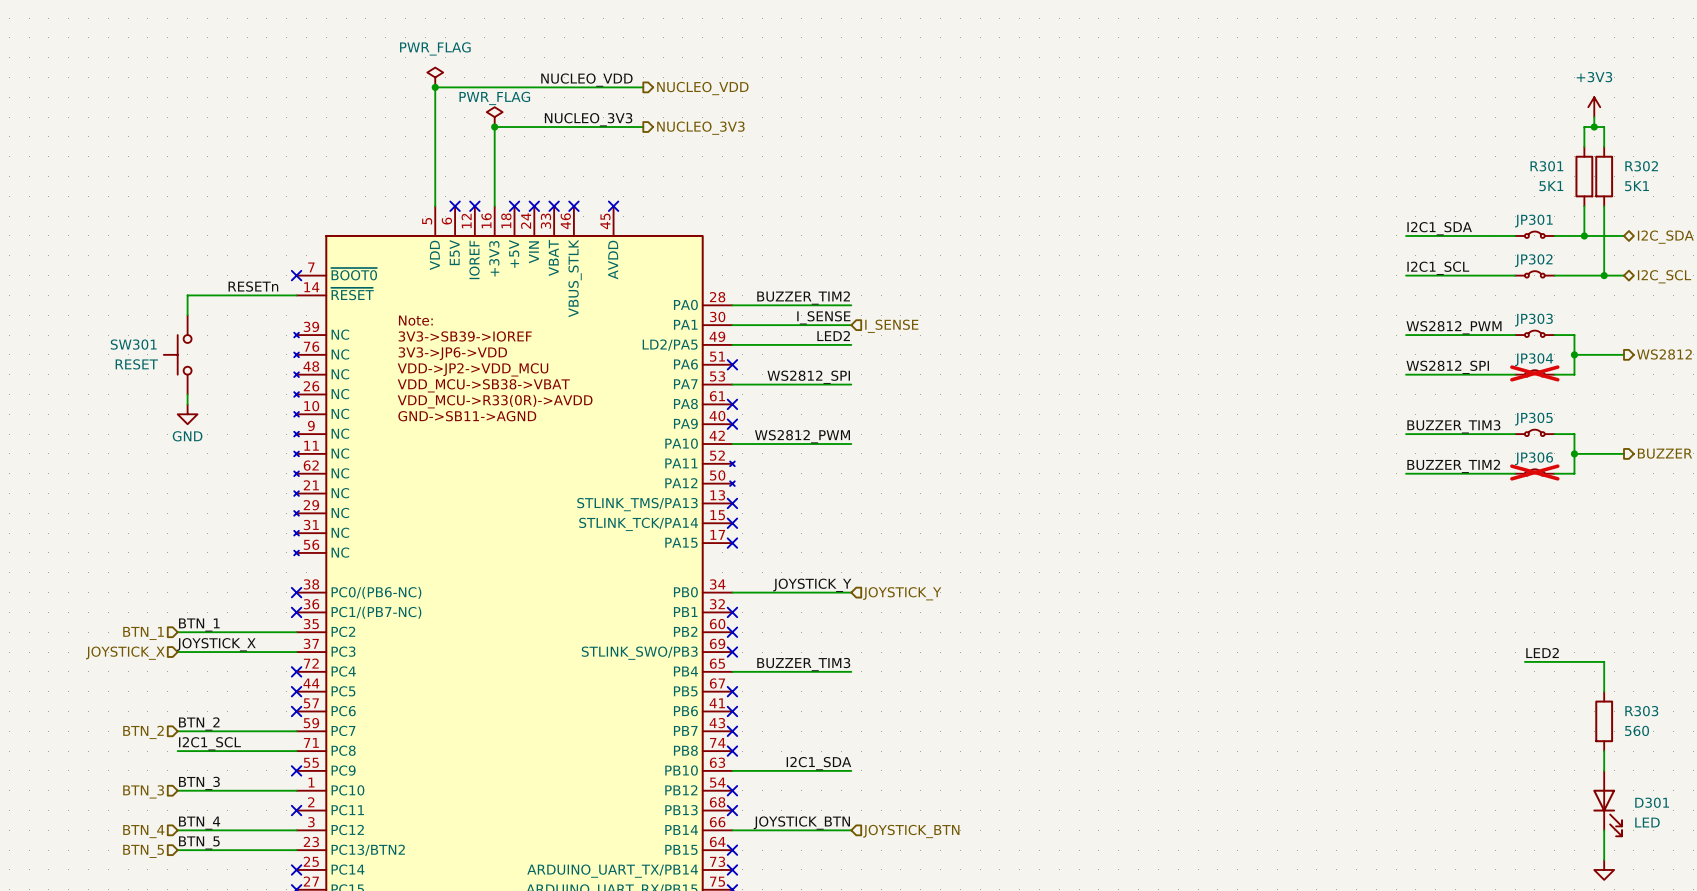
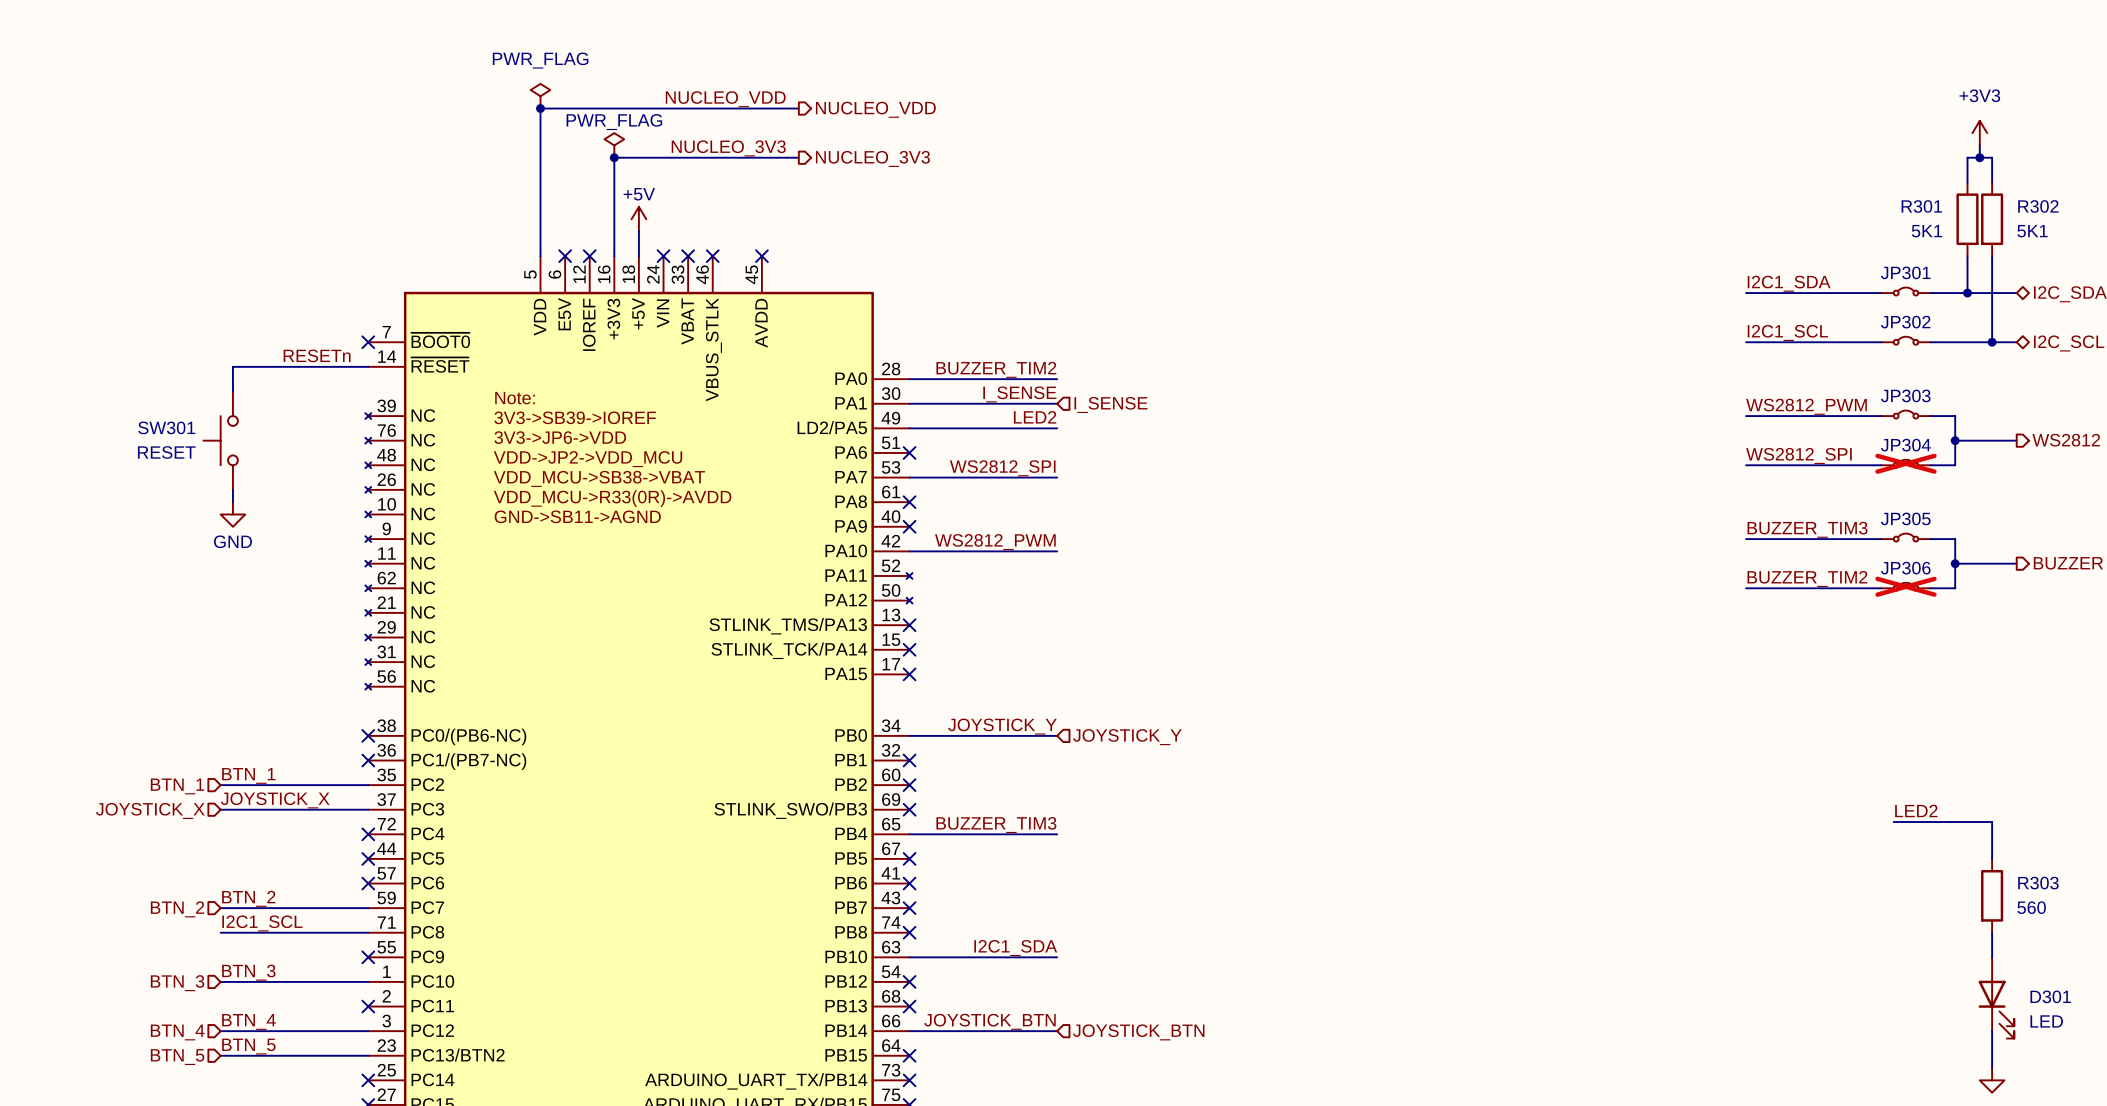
power symbol: none -> +5V (638, 219)
wire: none -> (638, 231) (638, 256)
no-connect mark: (514, 206) -> none

